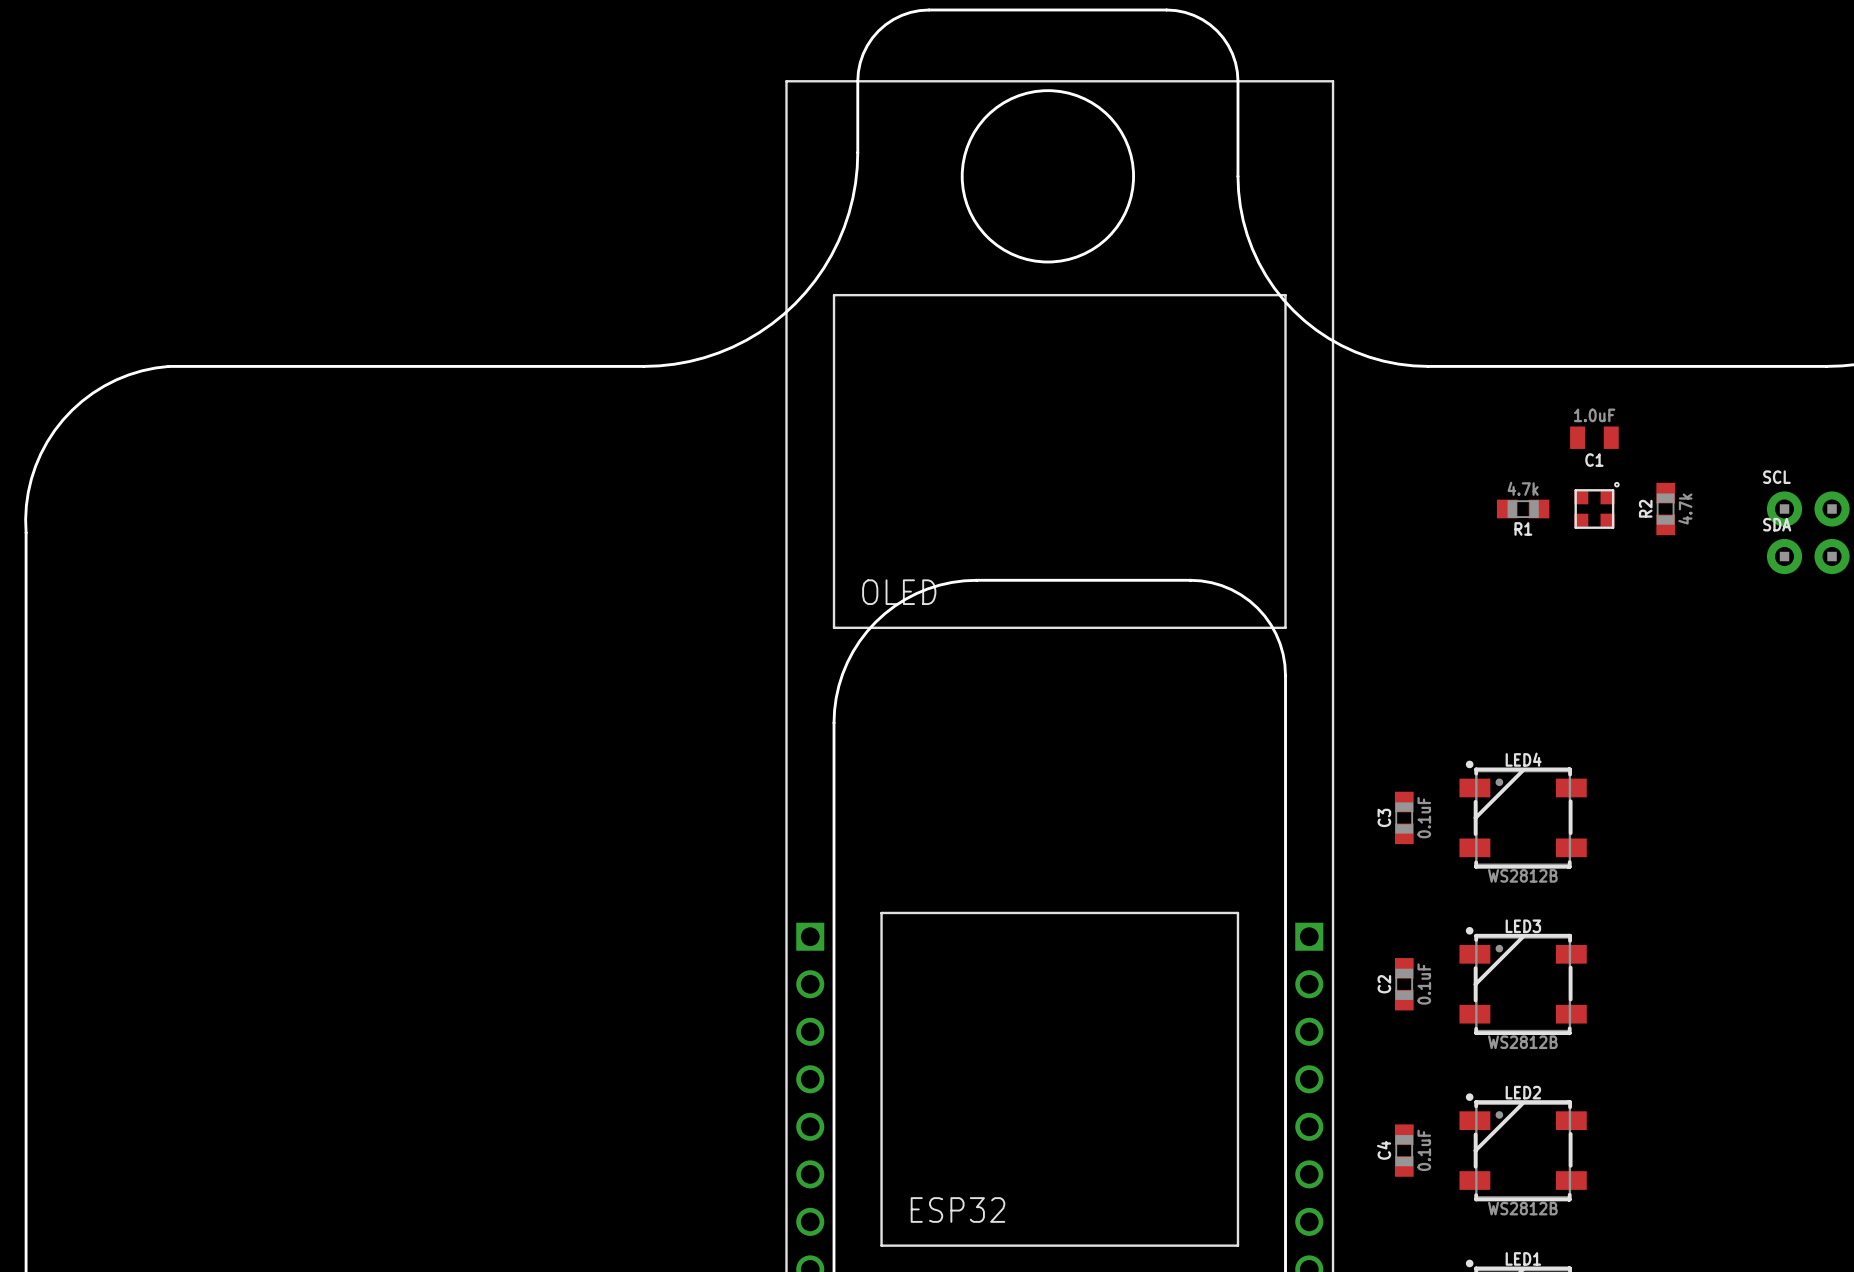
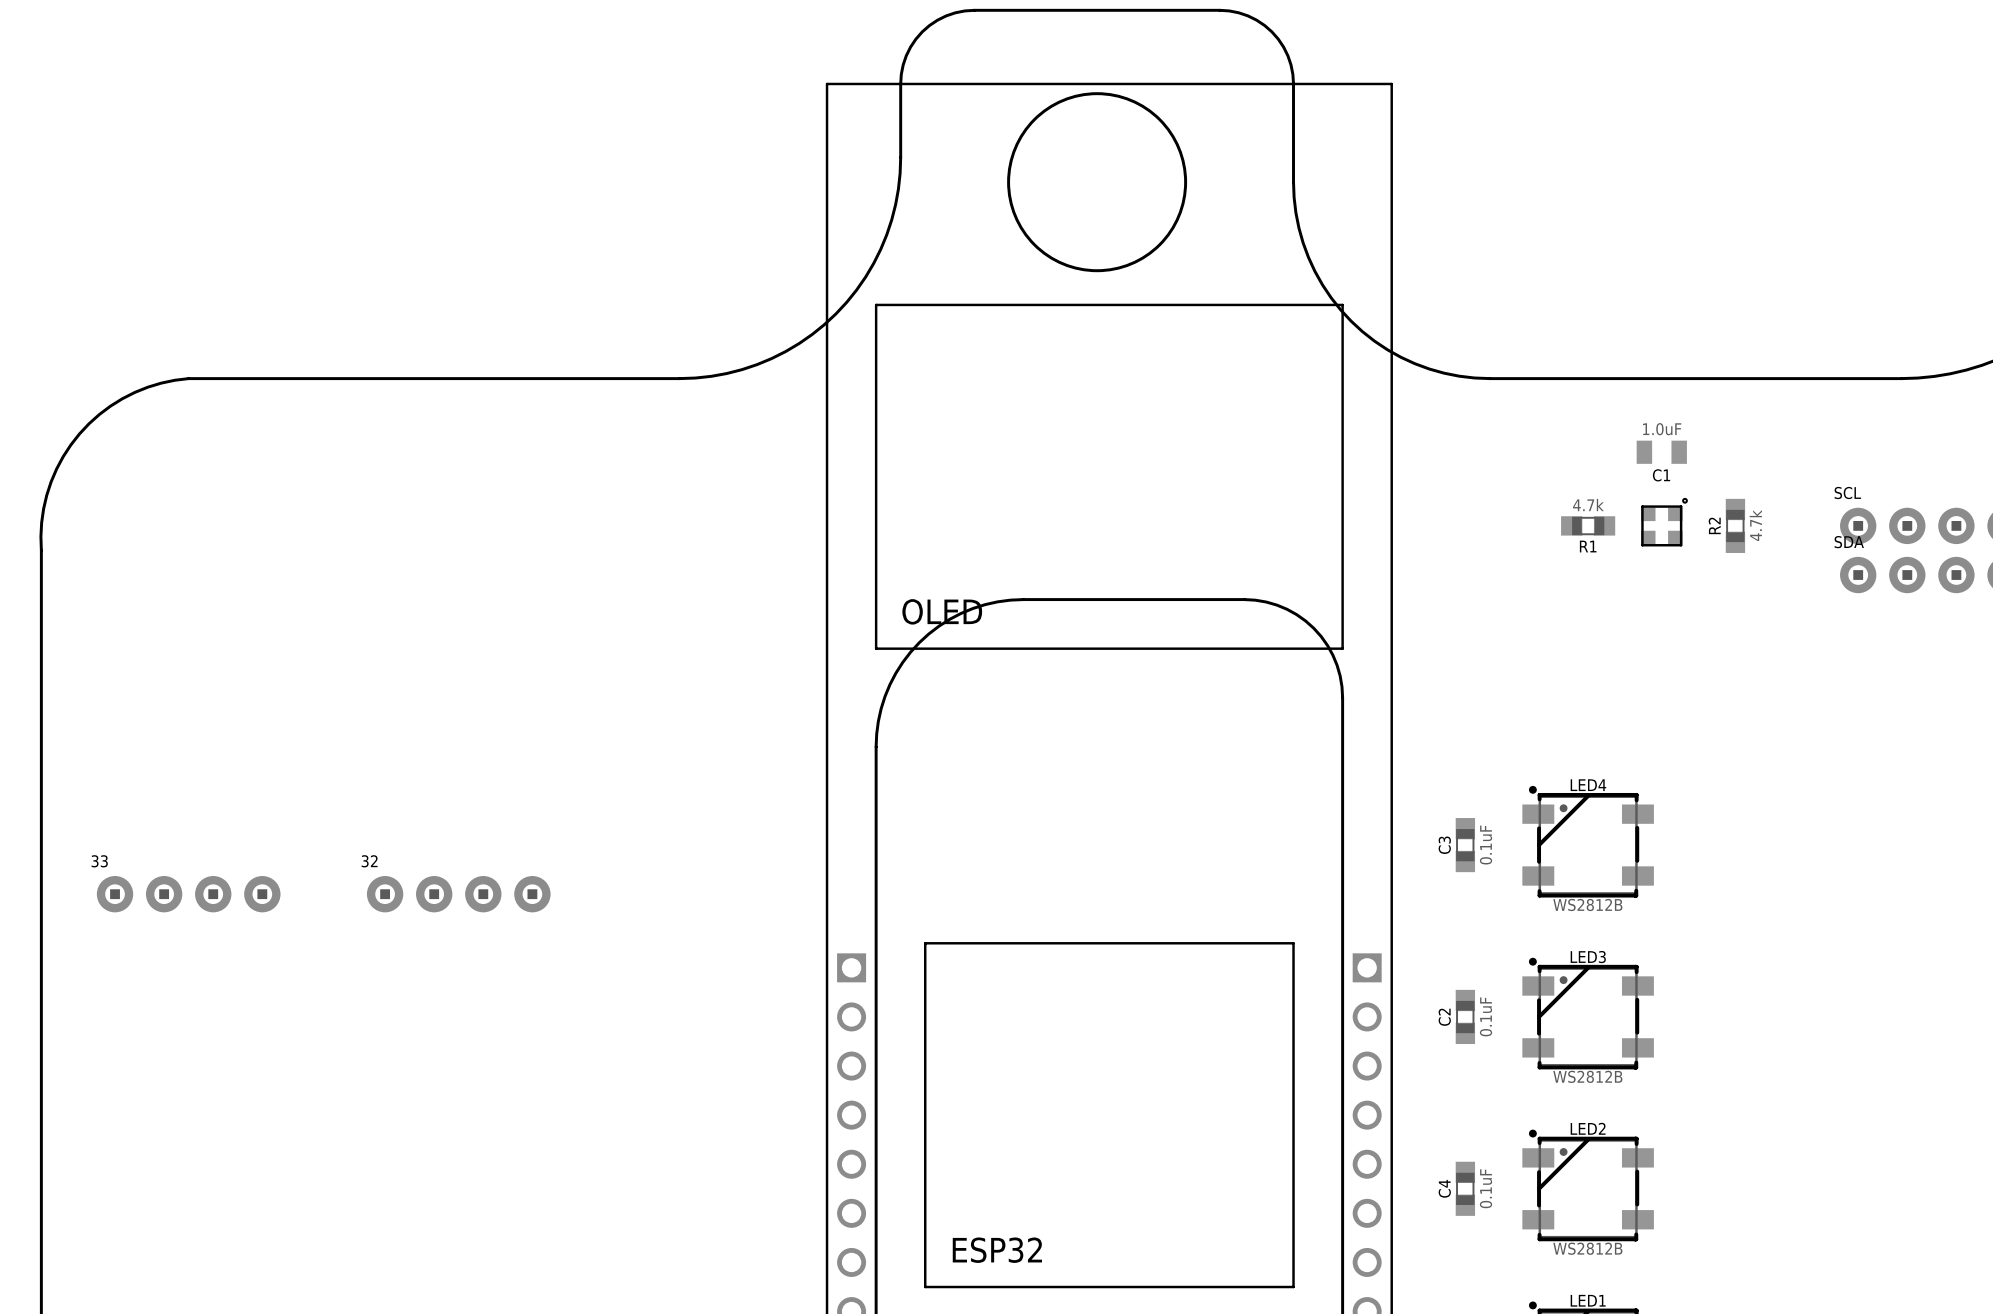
33: none -> (188, 894)
32: none -> (458, 894)

